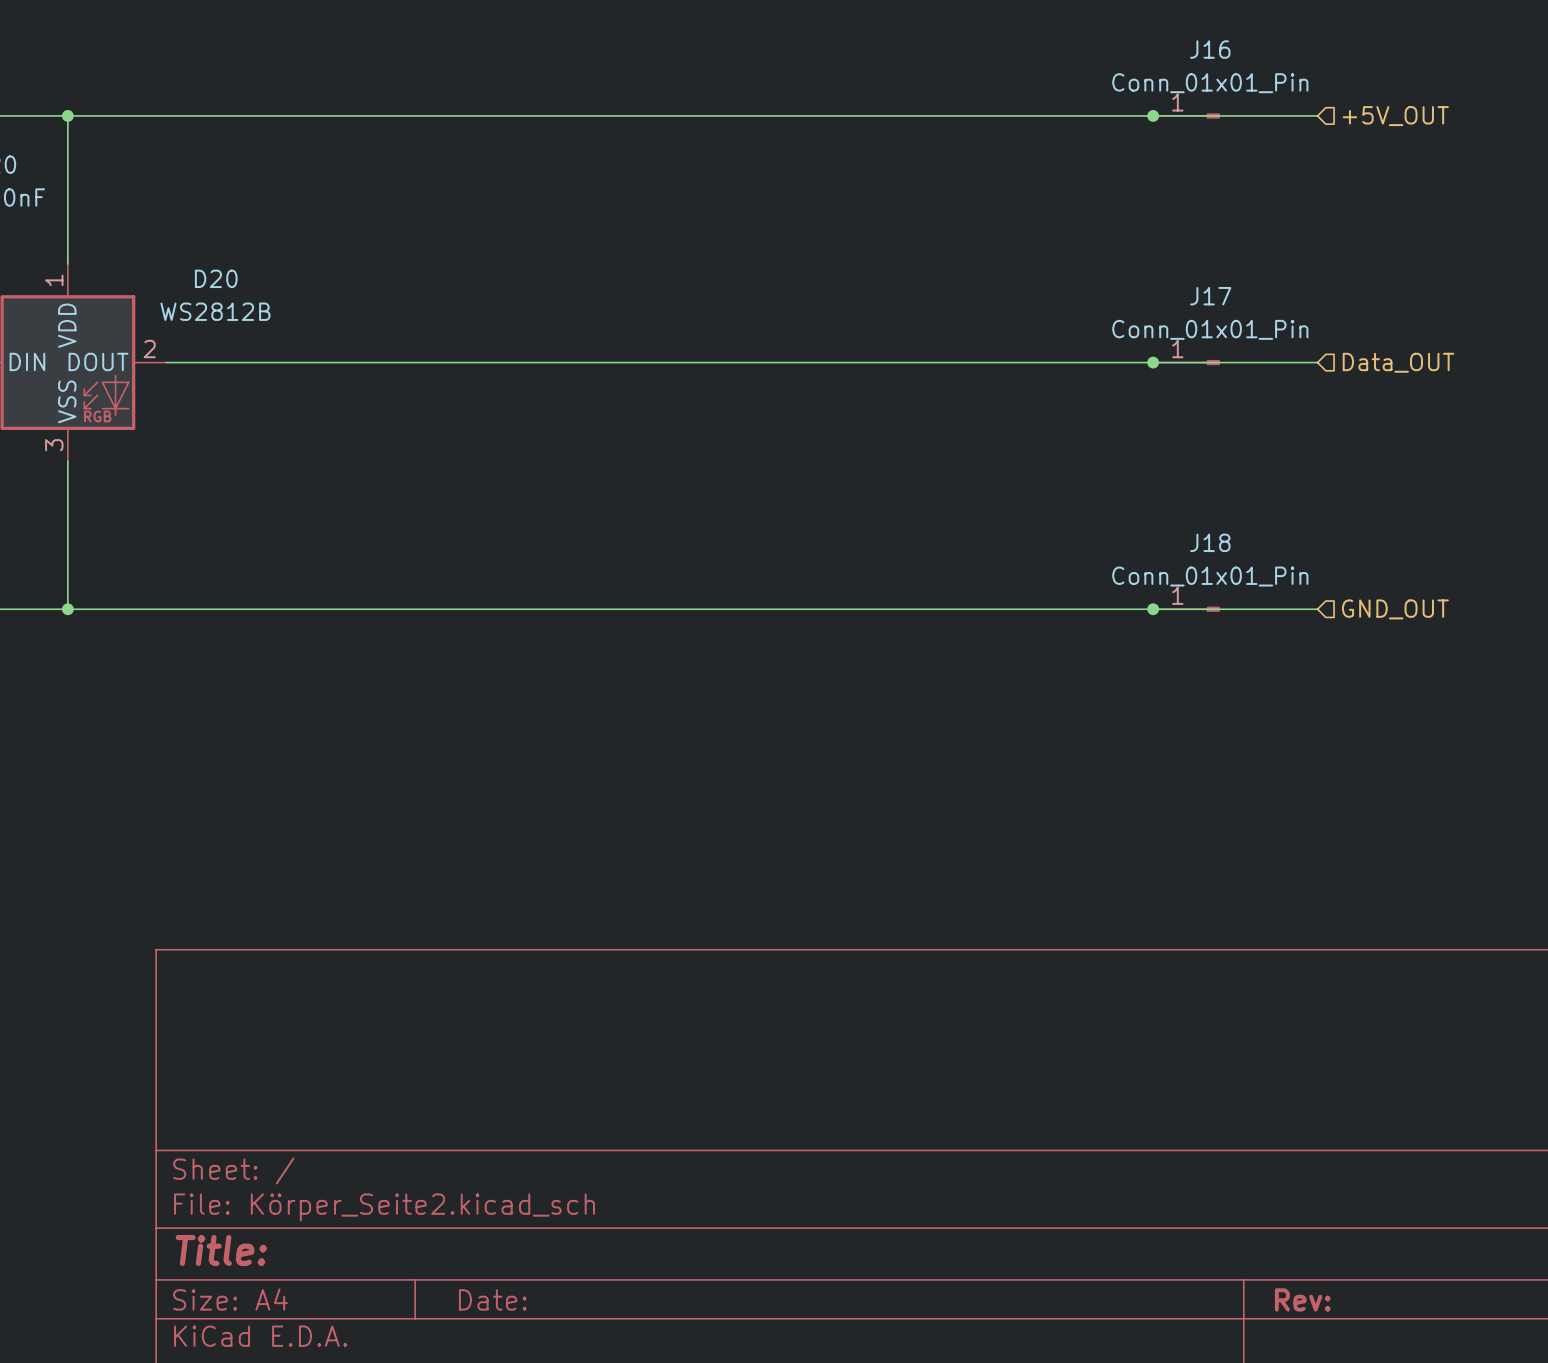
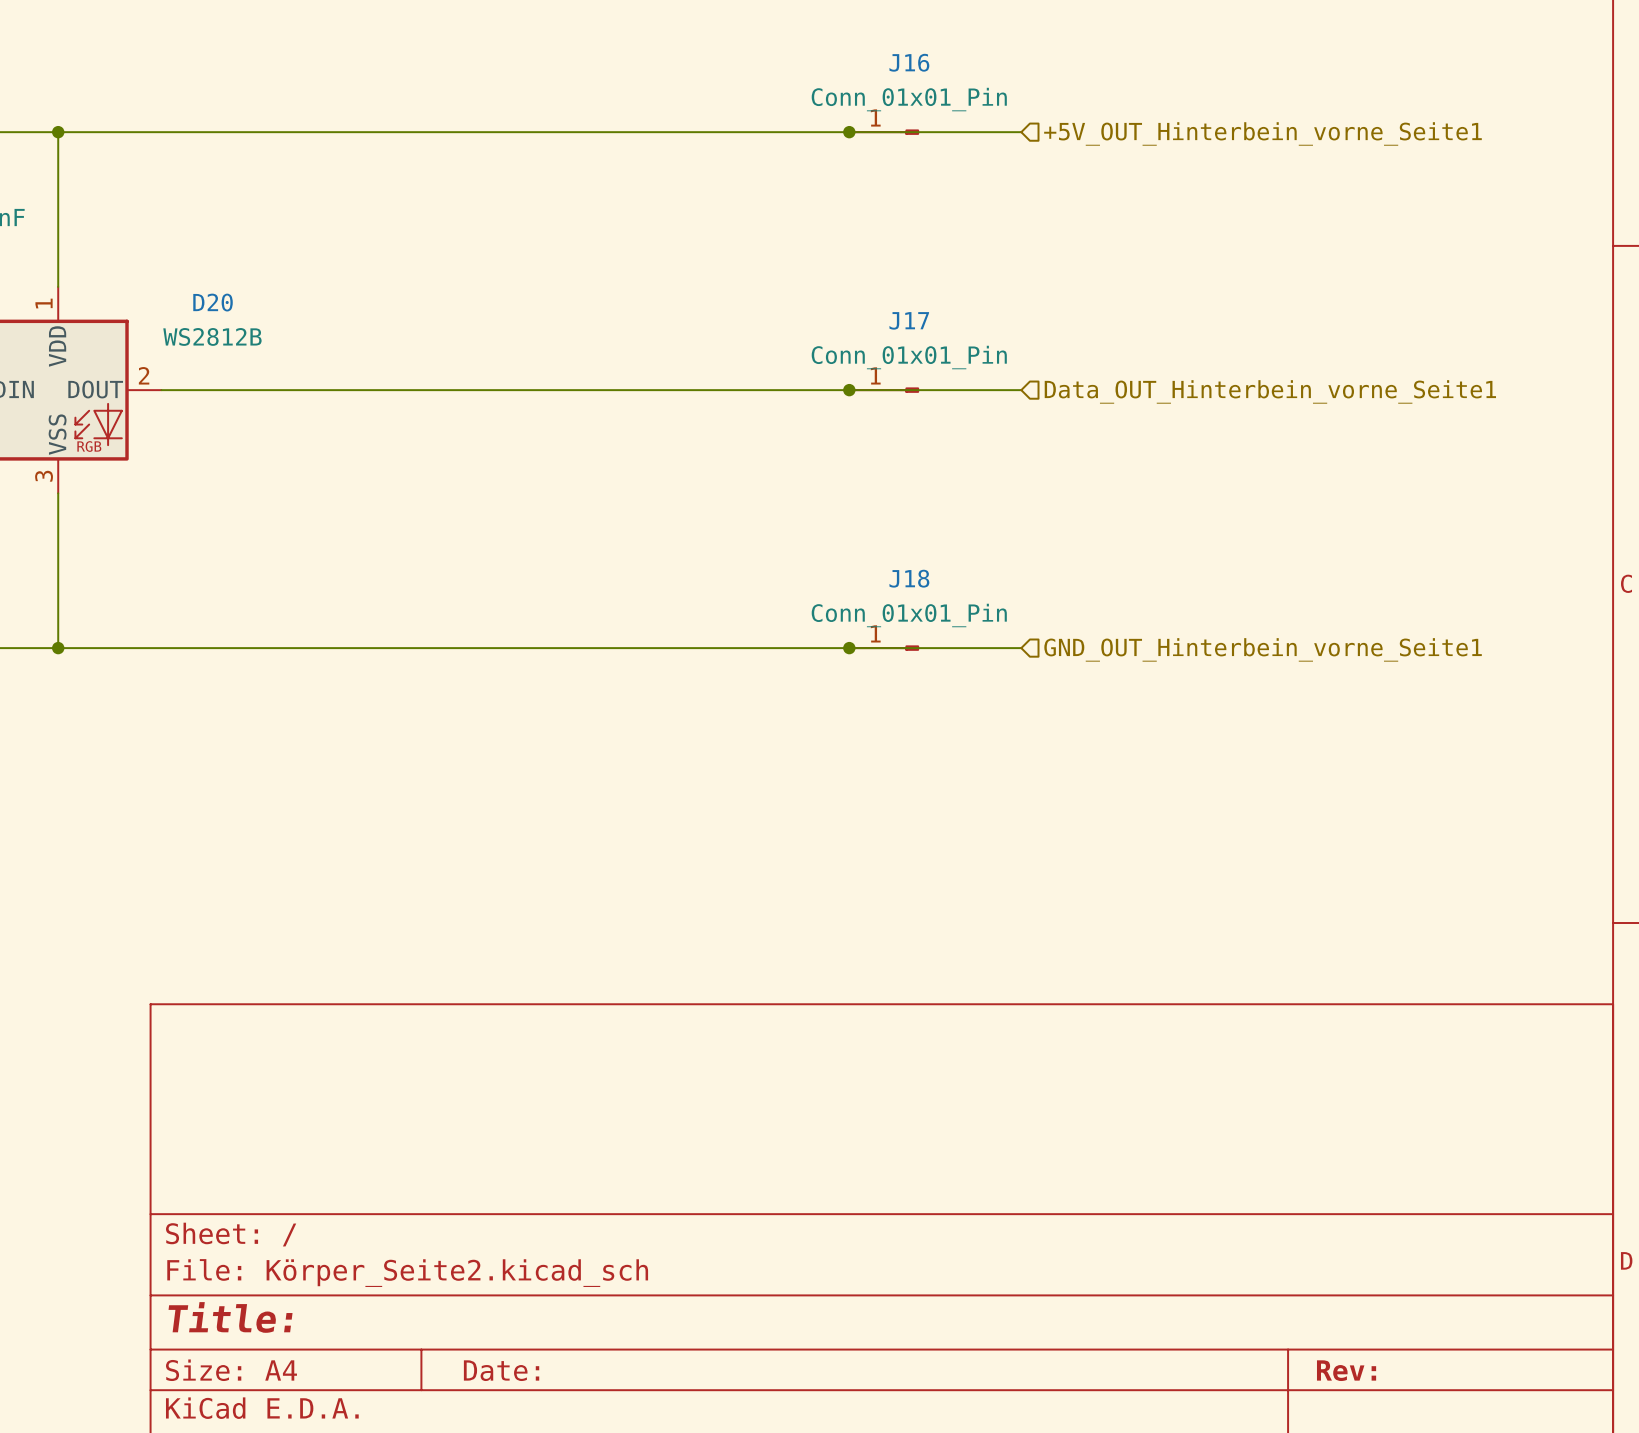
junction: none -> (849, 132)
wire: (988, 115) (1317, 115) -> none
junction: (1153, 115) -> none
J16 position: (1186, 115) -> (884, 132)
hierarchical label: none -> +5V_OUT_Hinterbein_vorne_Seite1 (1262, 133)
hierarchical label: +5V_OUT (1395, 116) -> none
junction: none -> (849, 390)
wire: (988, 362) (1317, 362) -> none
junction: (1153, 362) -> none
J17 position: (1186, 362) -> (884, 390)
hierarchical label: none -> Data_OUT_Hinterbein_vorne_Seite1 (1270, 391)
hierarchical label: Data_OUT (1398, 362) -> none
junction: none -> (849, 648)
wire: (988, 609) (1317, 609) -> none
junction: (1153, 609) -> none
J18 position: (1186, 609) -> (884, 648)
hierarchical label: none -> GND_OUT_Hinterbein_vorne_Seite1 (1263, 649)
hierarchical label: GND_OUT (1395, 609) -> none

